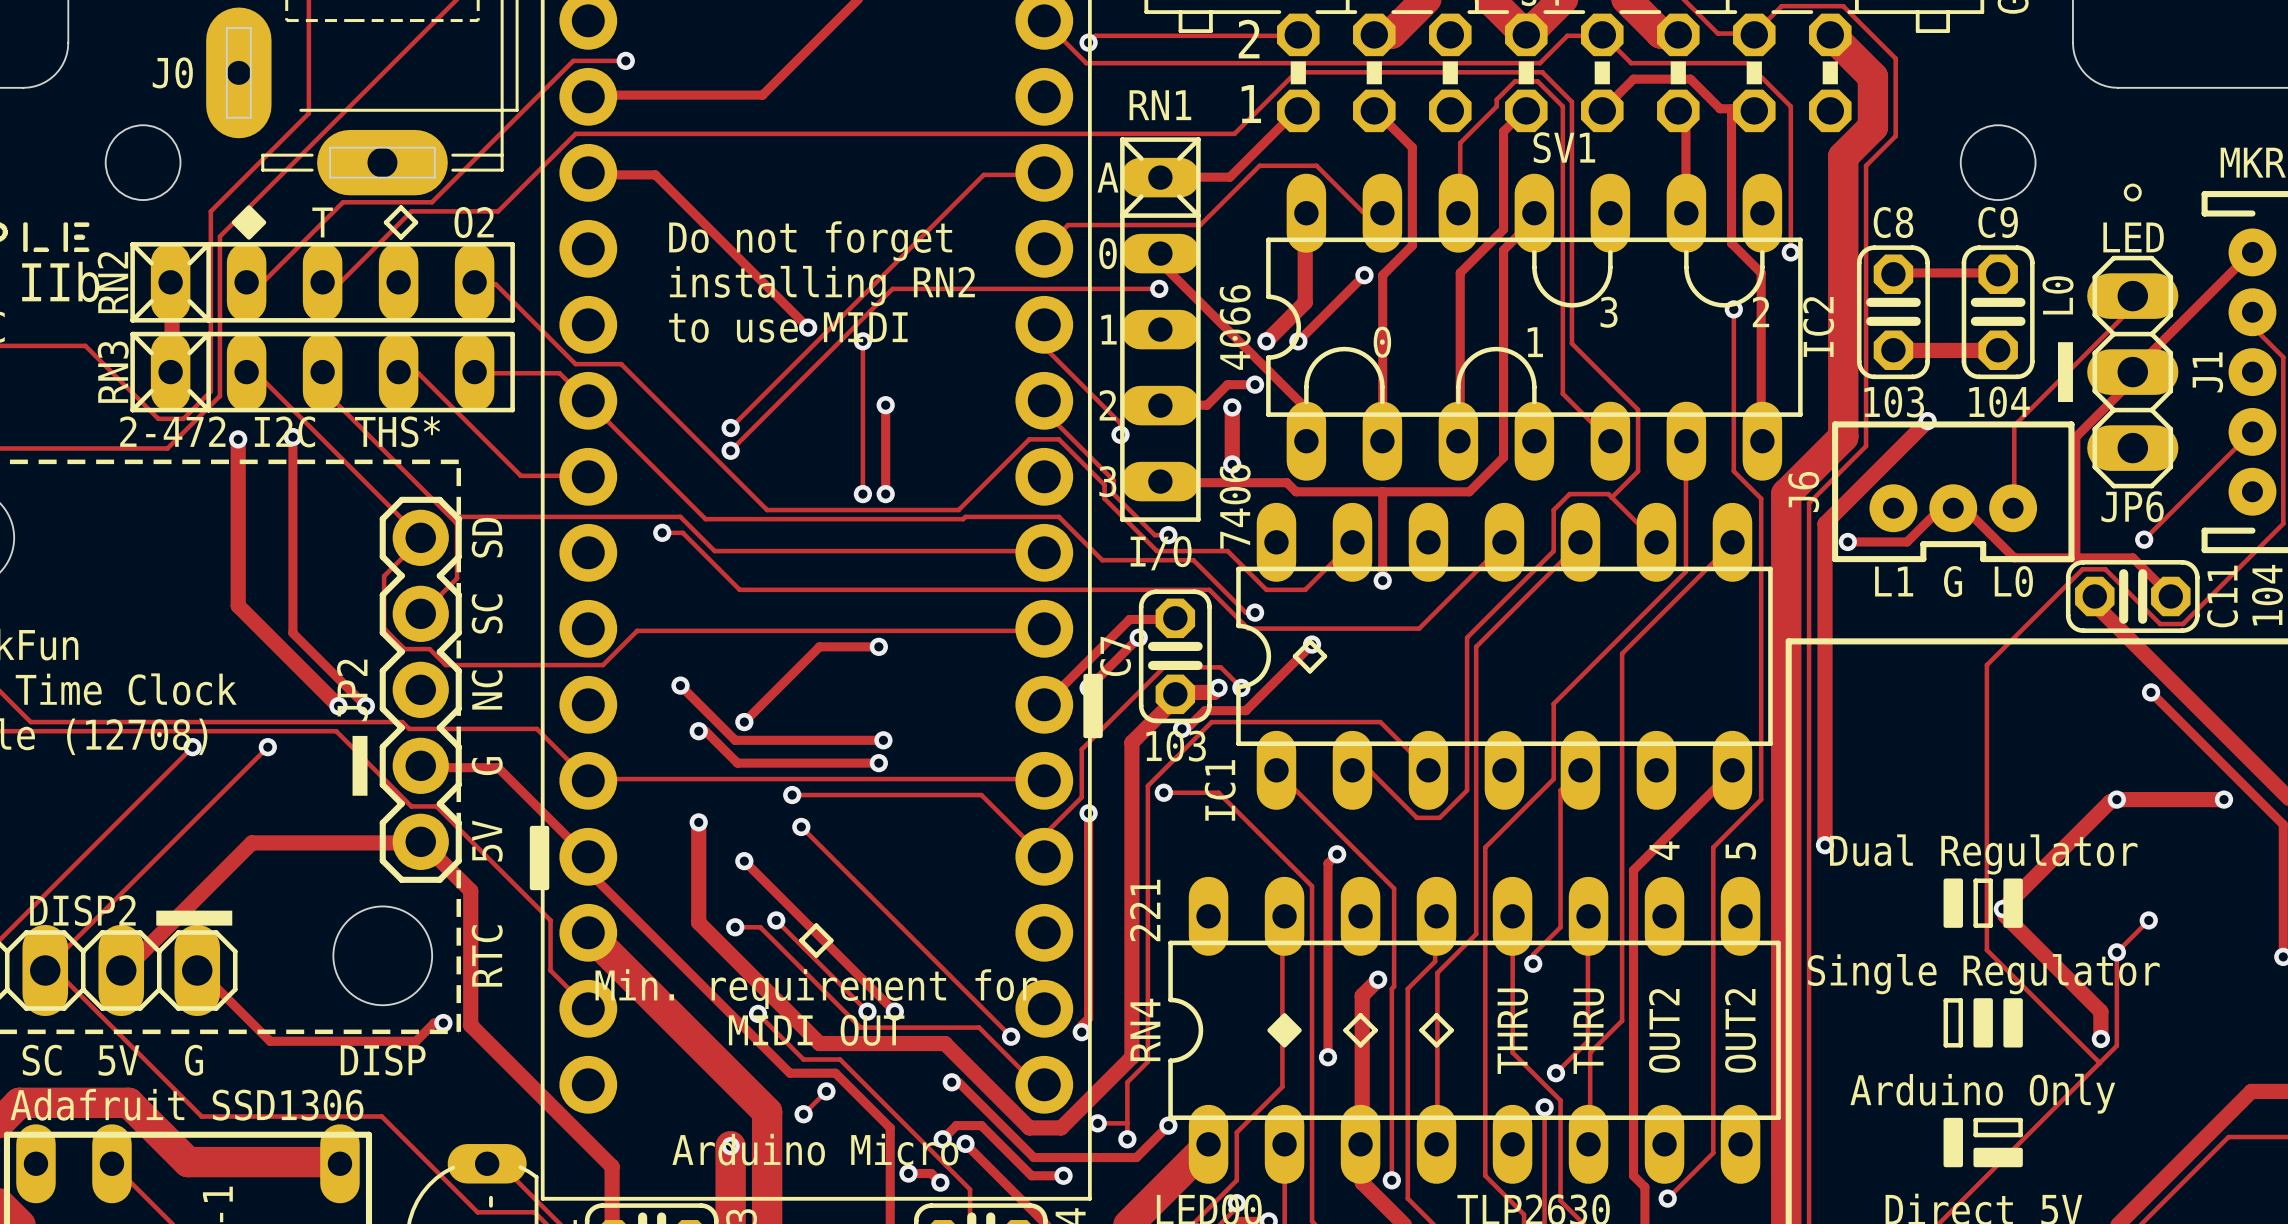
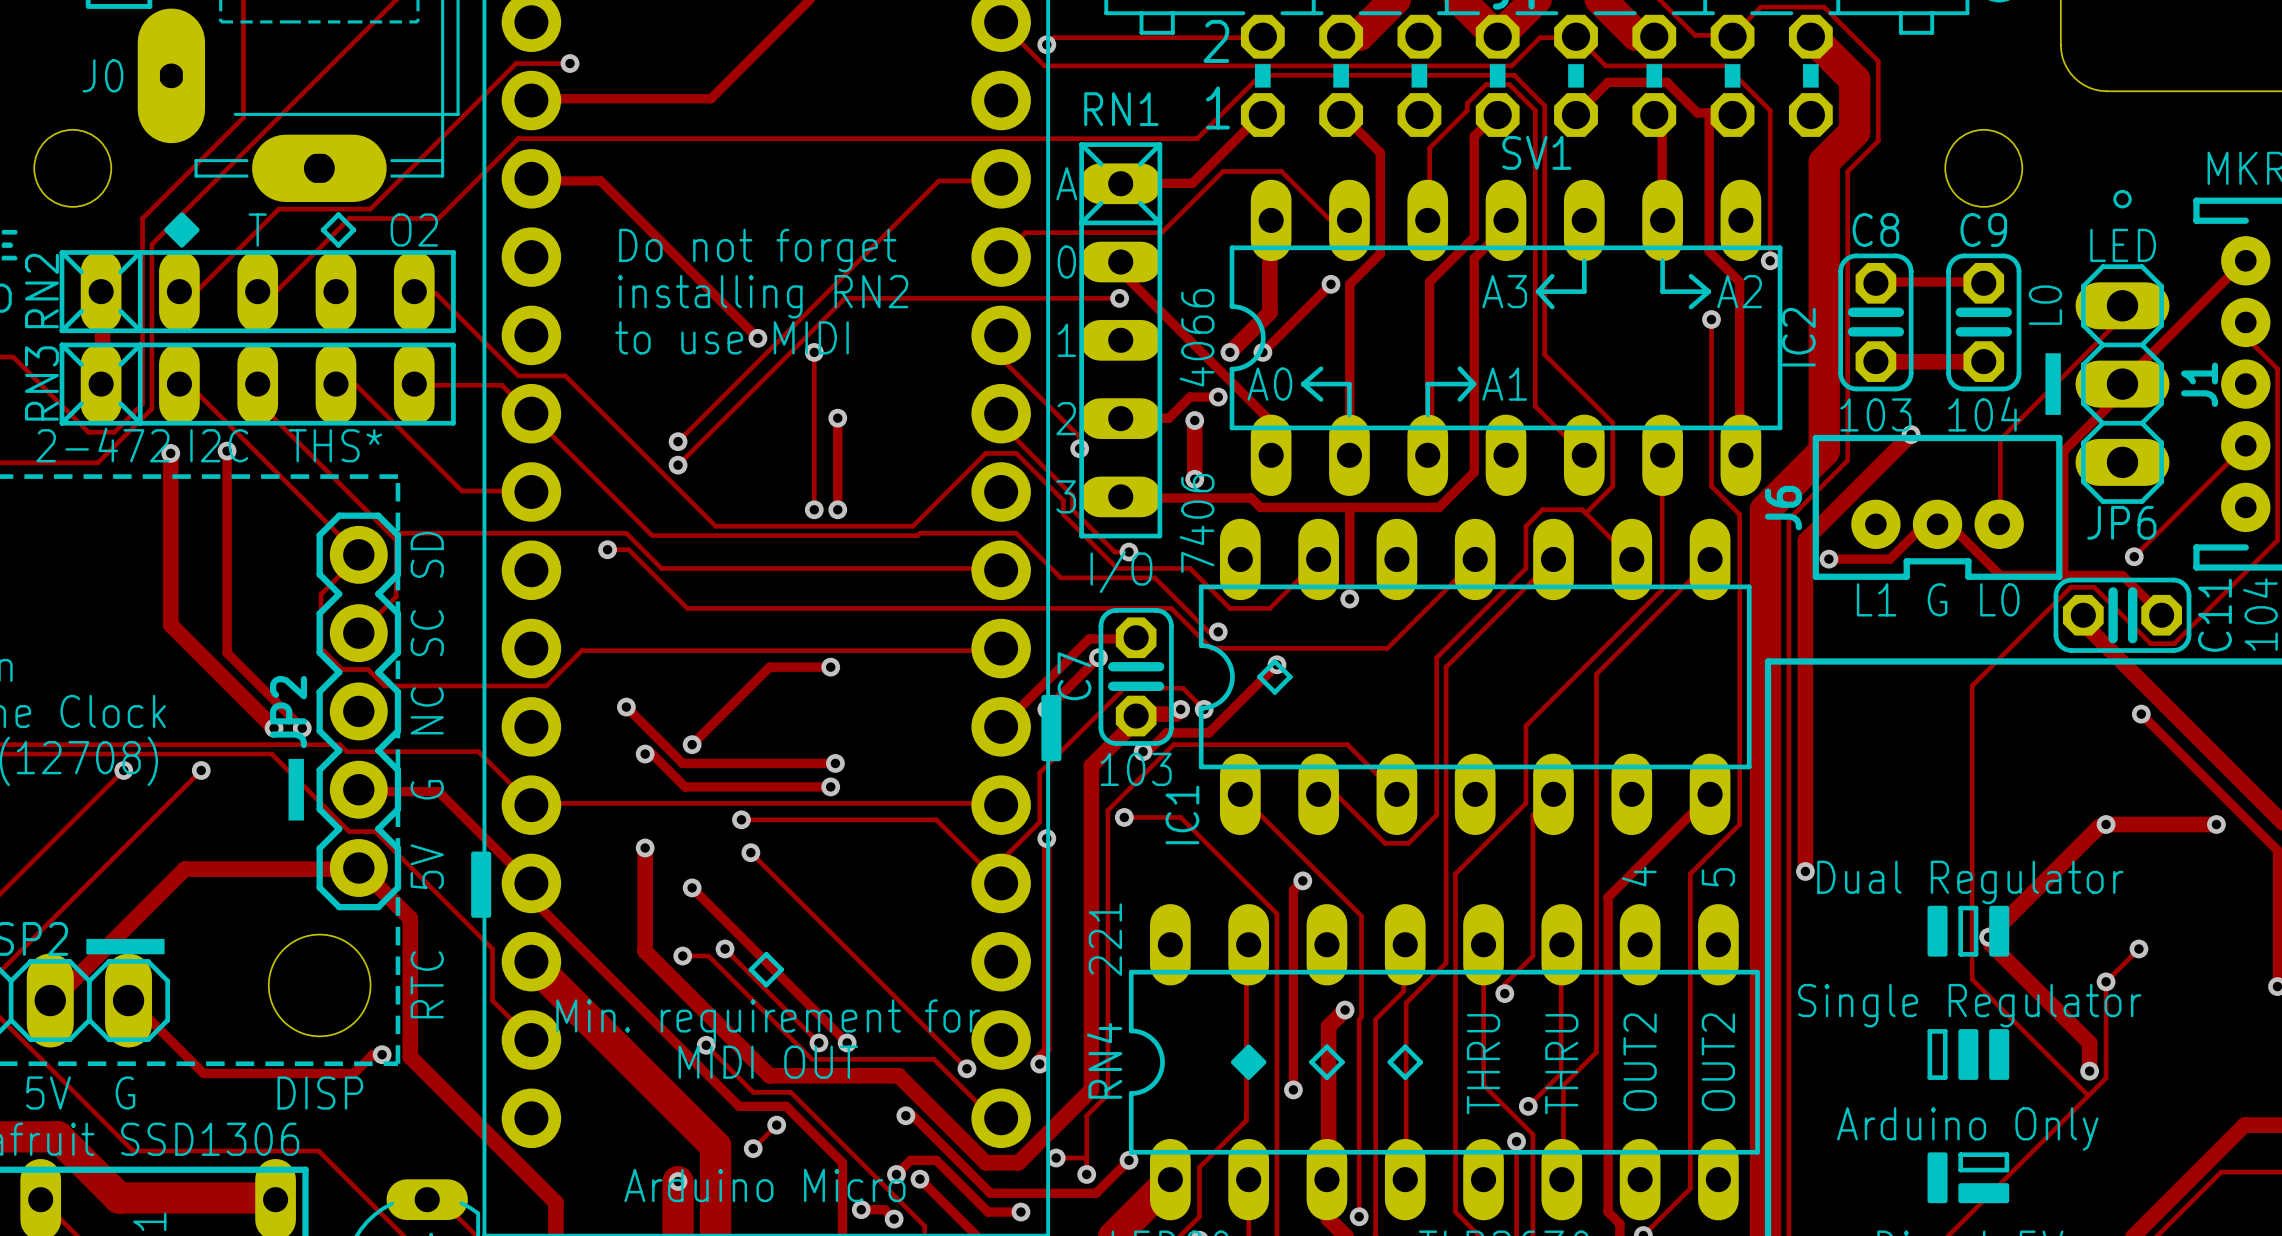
line: (1534, 252) (1534, 272) (1539, 286) (1553, 300) (1567, 305) (1582, 304) (1595, 297) (1605, 286) (1610, 267) -> (1538, 291) (1584, 291) (1584, 276)
line: (1762, 252) (1762, 272) (1757, 286) (1743, 300) (1729, 305) (1714, 304) (1701, 297) (1691, 286) (1686, 267) -> (1708, 291) (1662, 291) (1662, 276)
line: none -> (1552, 276) (1538, 291)
line: none -> (1690, 276) (1708, 291)
text: none -> A3 (1504, 291)
line: none -> (1538, 291) (1552, 307)
line: none -> (1708, 291) (1690, 307)
text: 2 (1760, 311) -> A2 (1739, 291)
text: 3 (1609, 312) -> none
text: 0 (1382, 342) -> none
text: 1 (1535, 342) -> A1 (1504, 384)
line: none -> (1321, 368) (1303, 384)
line: none -> (1459, 368) (1473, 384)
text: none -> A0 (1269, 384)
line: none -> (1303, 384) (1321, 399)
line: none -> (1473, 384) (1459, 399)
line: (1382, 387) (1377, 368) (1367, 356) (1354, 350) (1339, 349) (1325, 354) (1311, 368) (1306, 382) (1306, 402) -> (1349, 399) (1349, 384) (1303, 384)
line: (1458, 387) (1463, 368) (1473, 356) (1486, 350) (1501, 349) (1515, 354) (1529, 368) (1534, 382) (1534, 402) -> (1427, 399) (1427, 384) (1473, 384)

